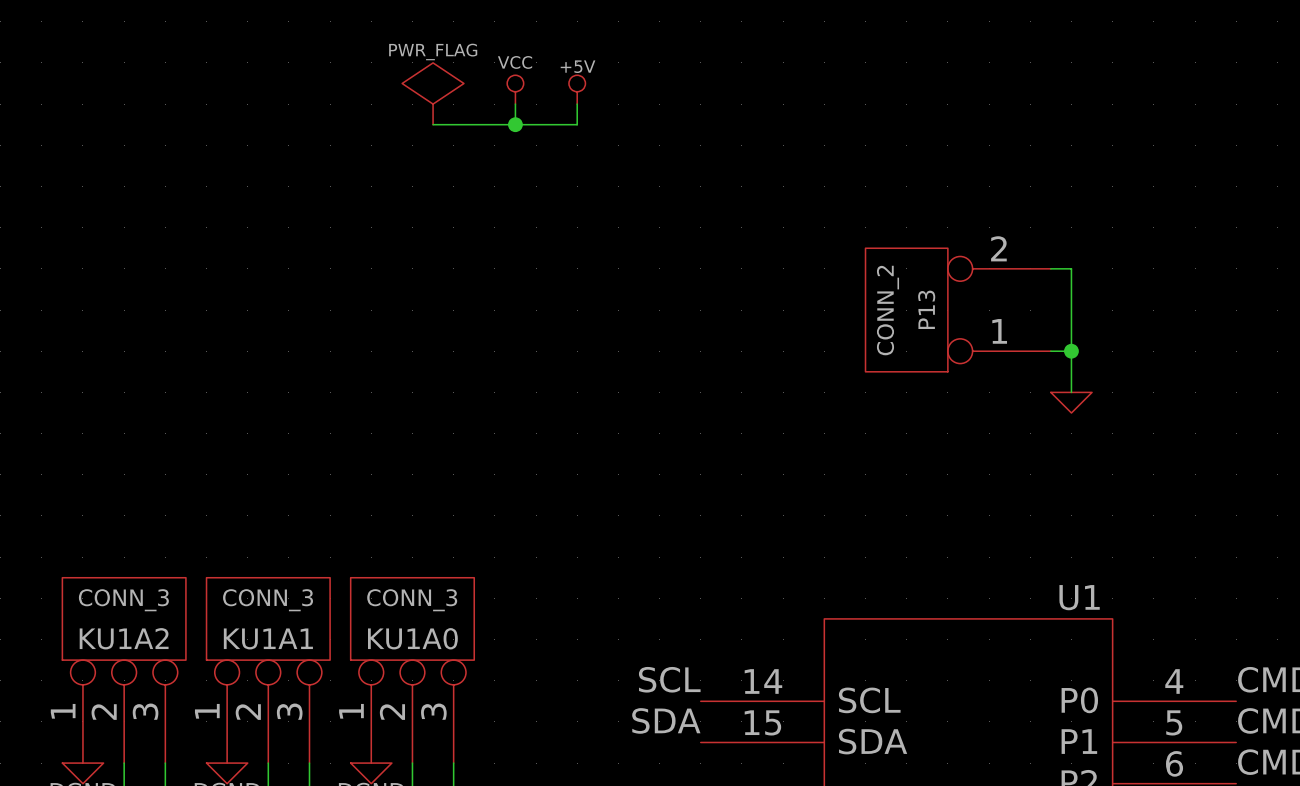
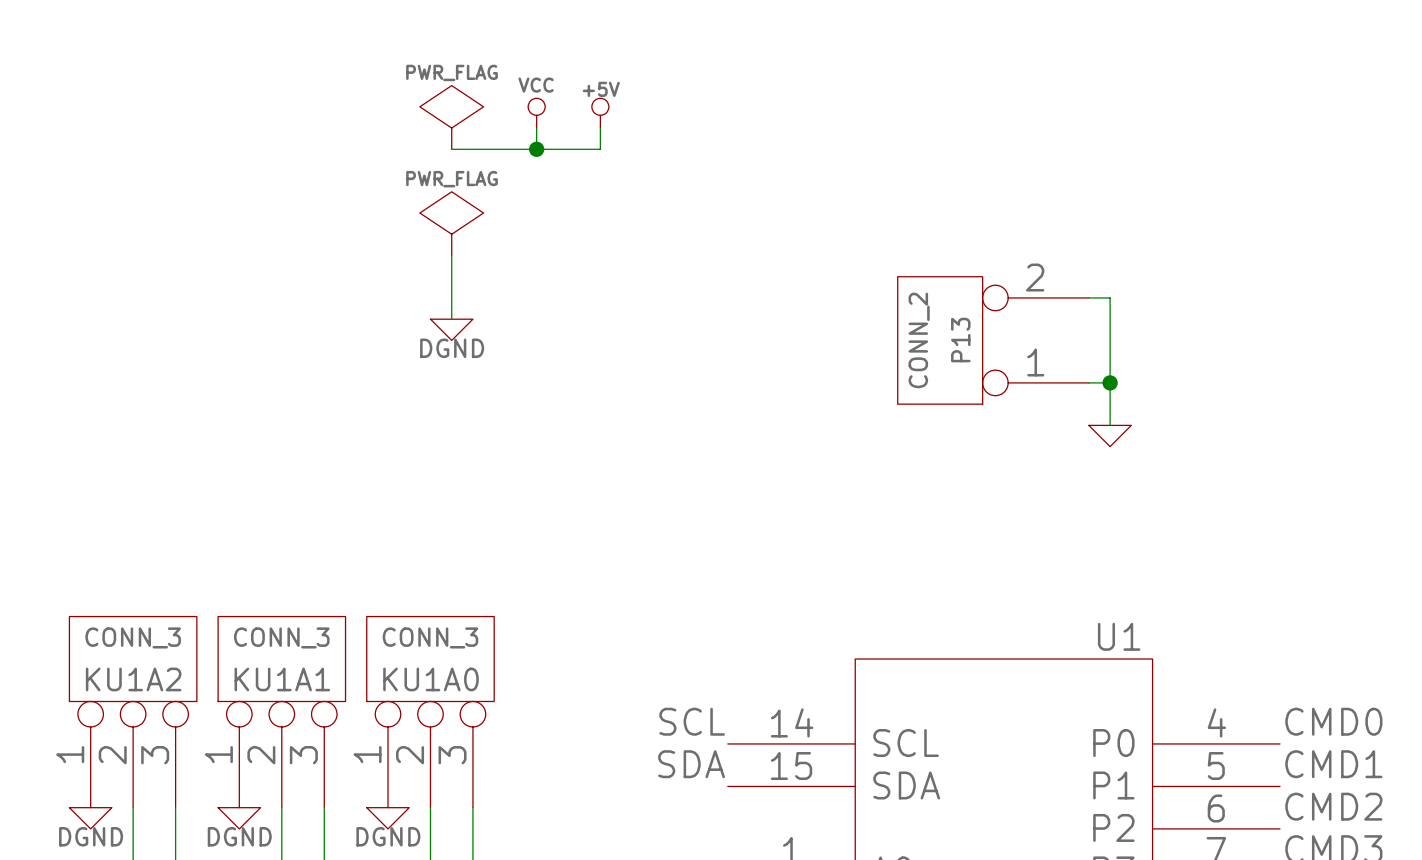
power symbol: none -> PWR_FLAG (451, 223)
wire: none -> (451, 255) (451, 319)
power symbol: none -> DGND (451, 329)

